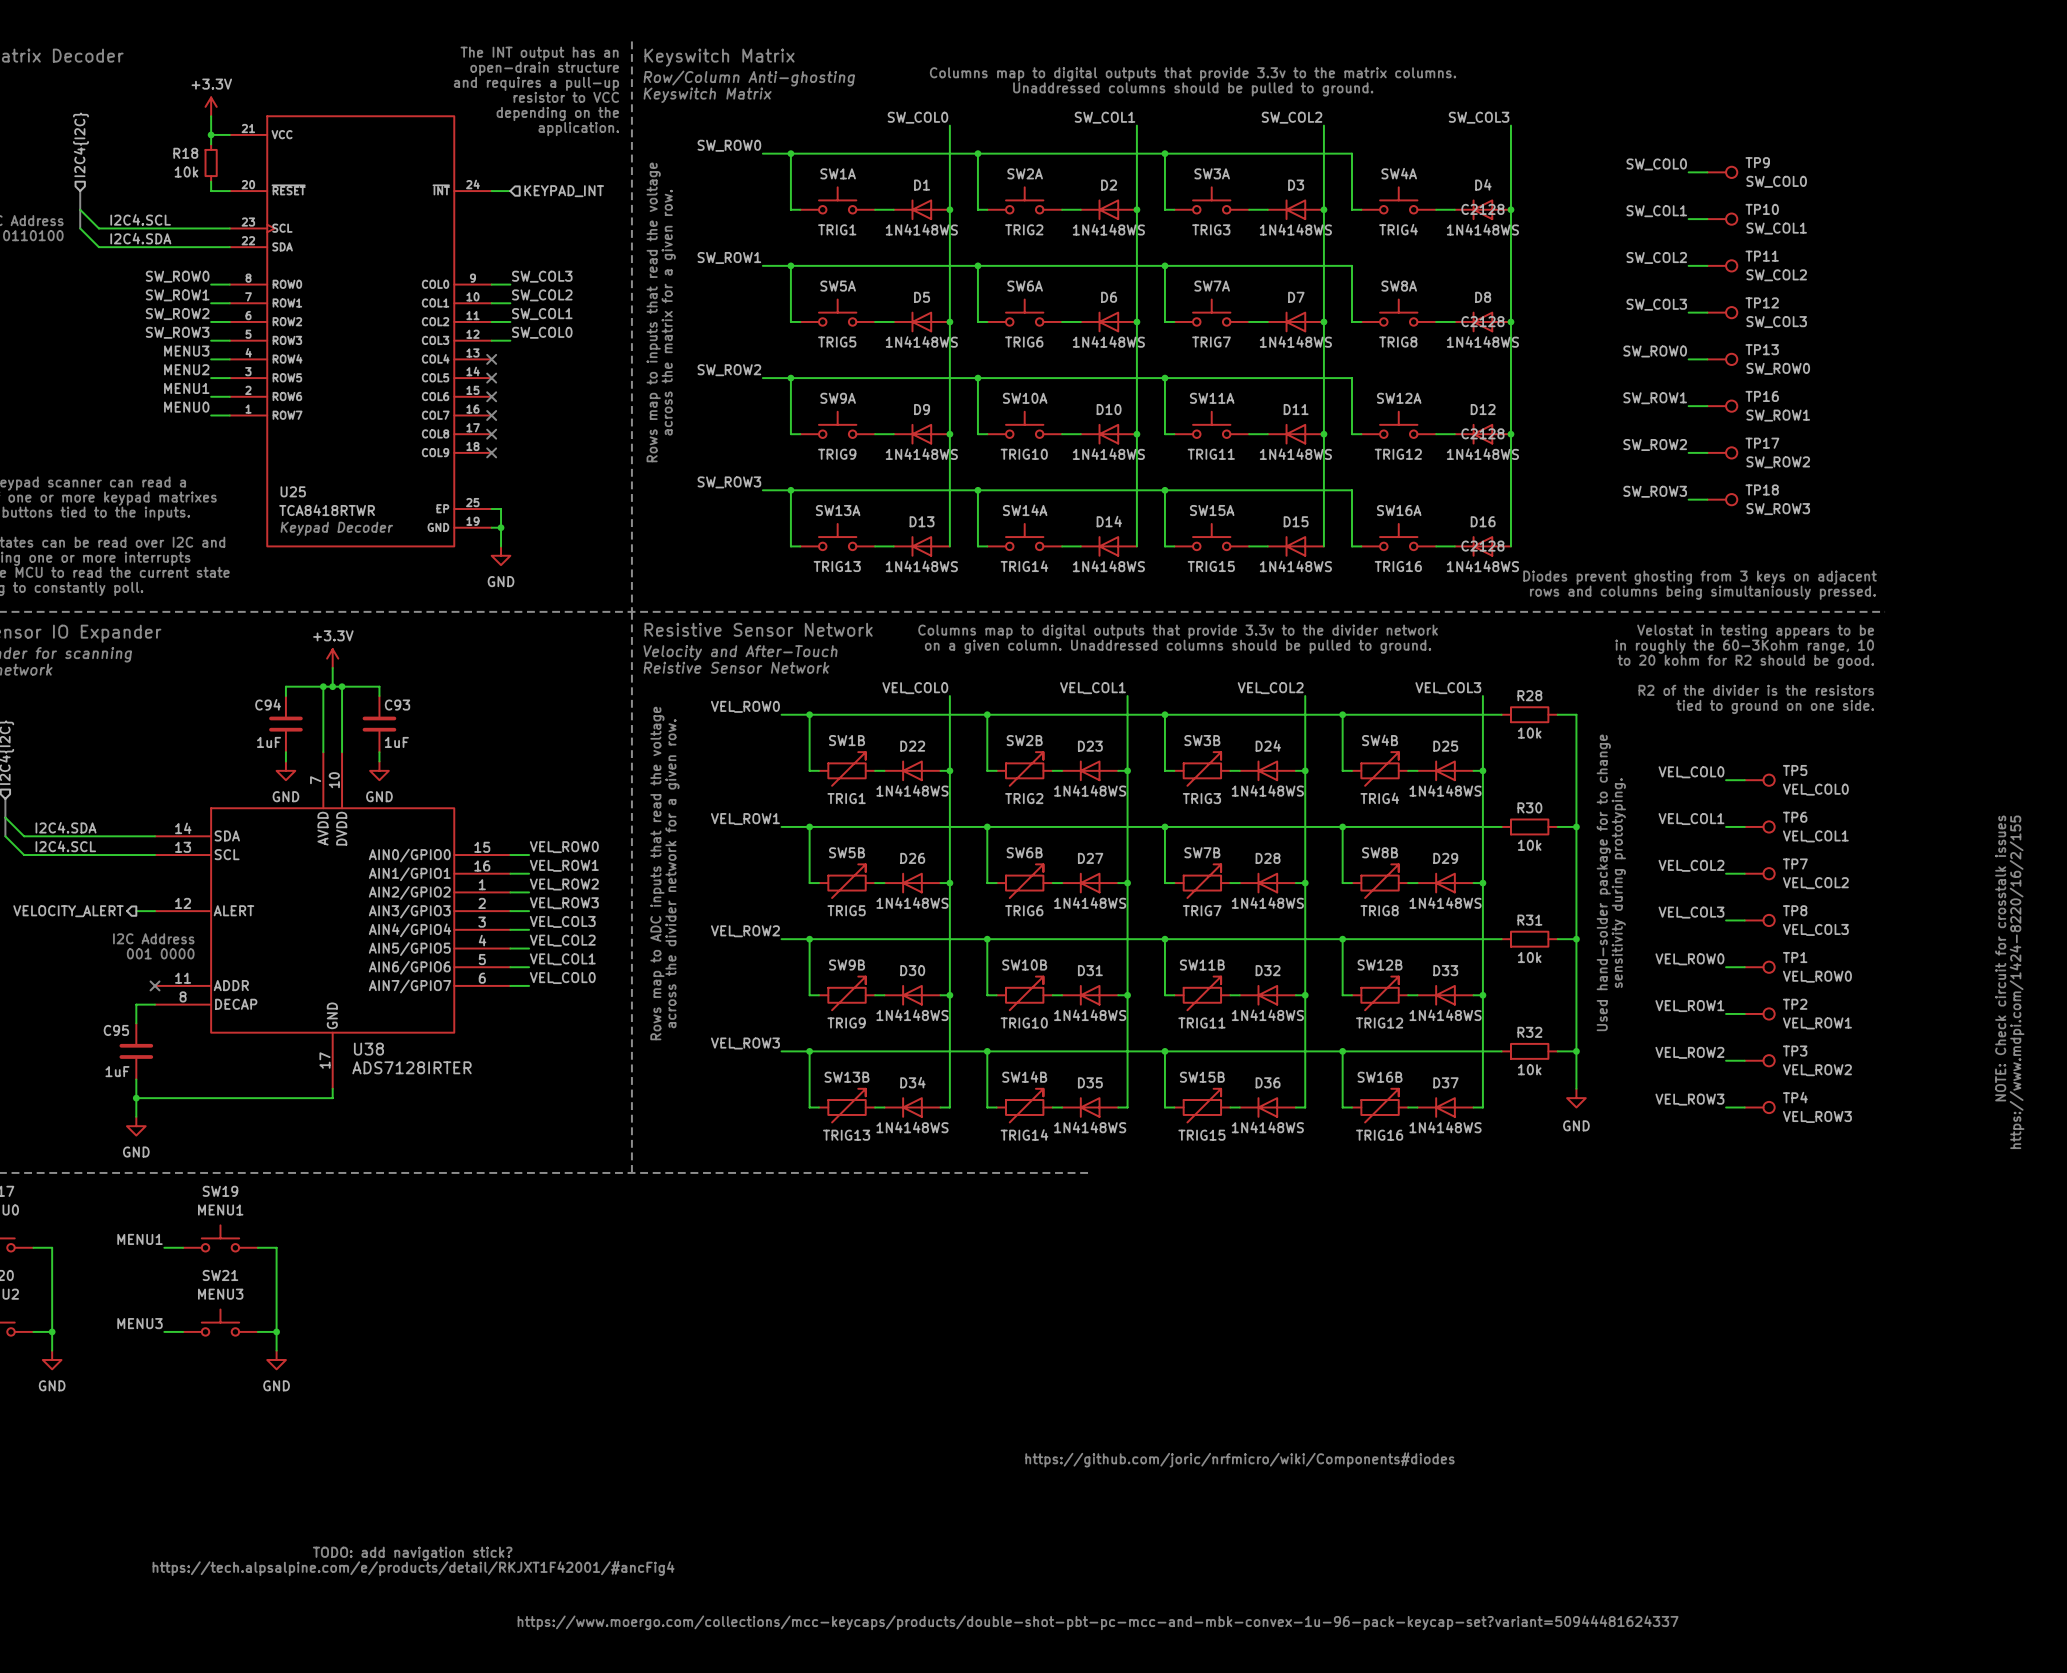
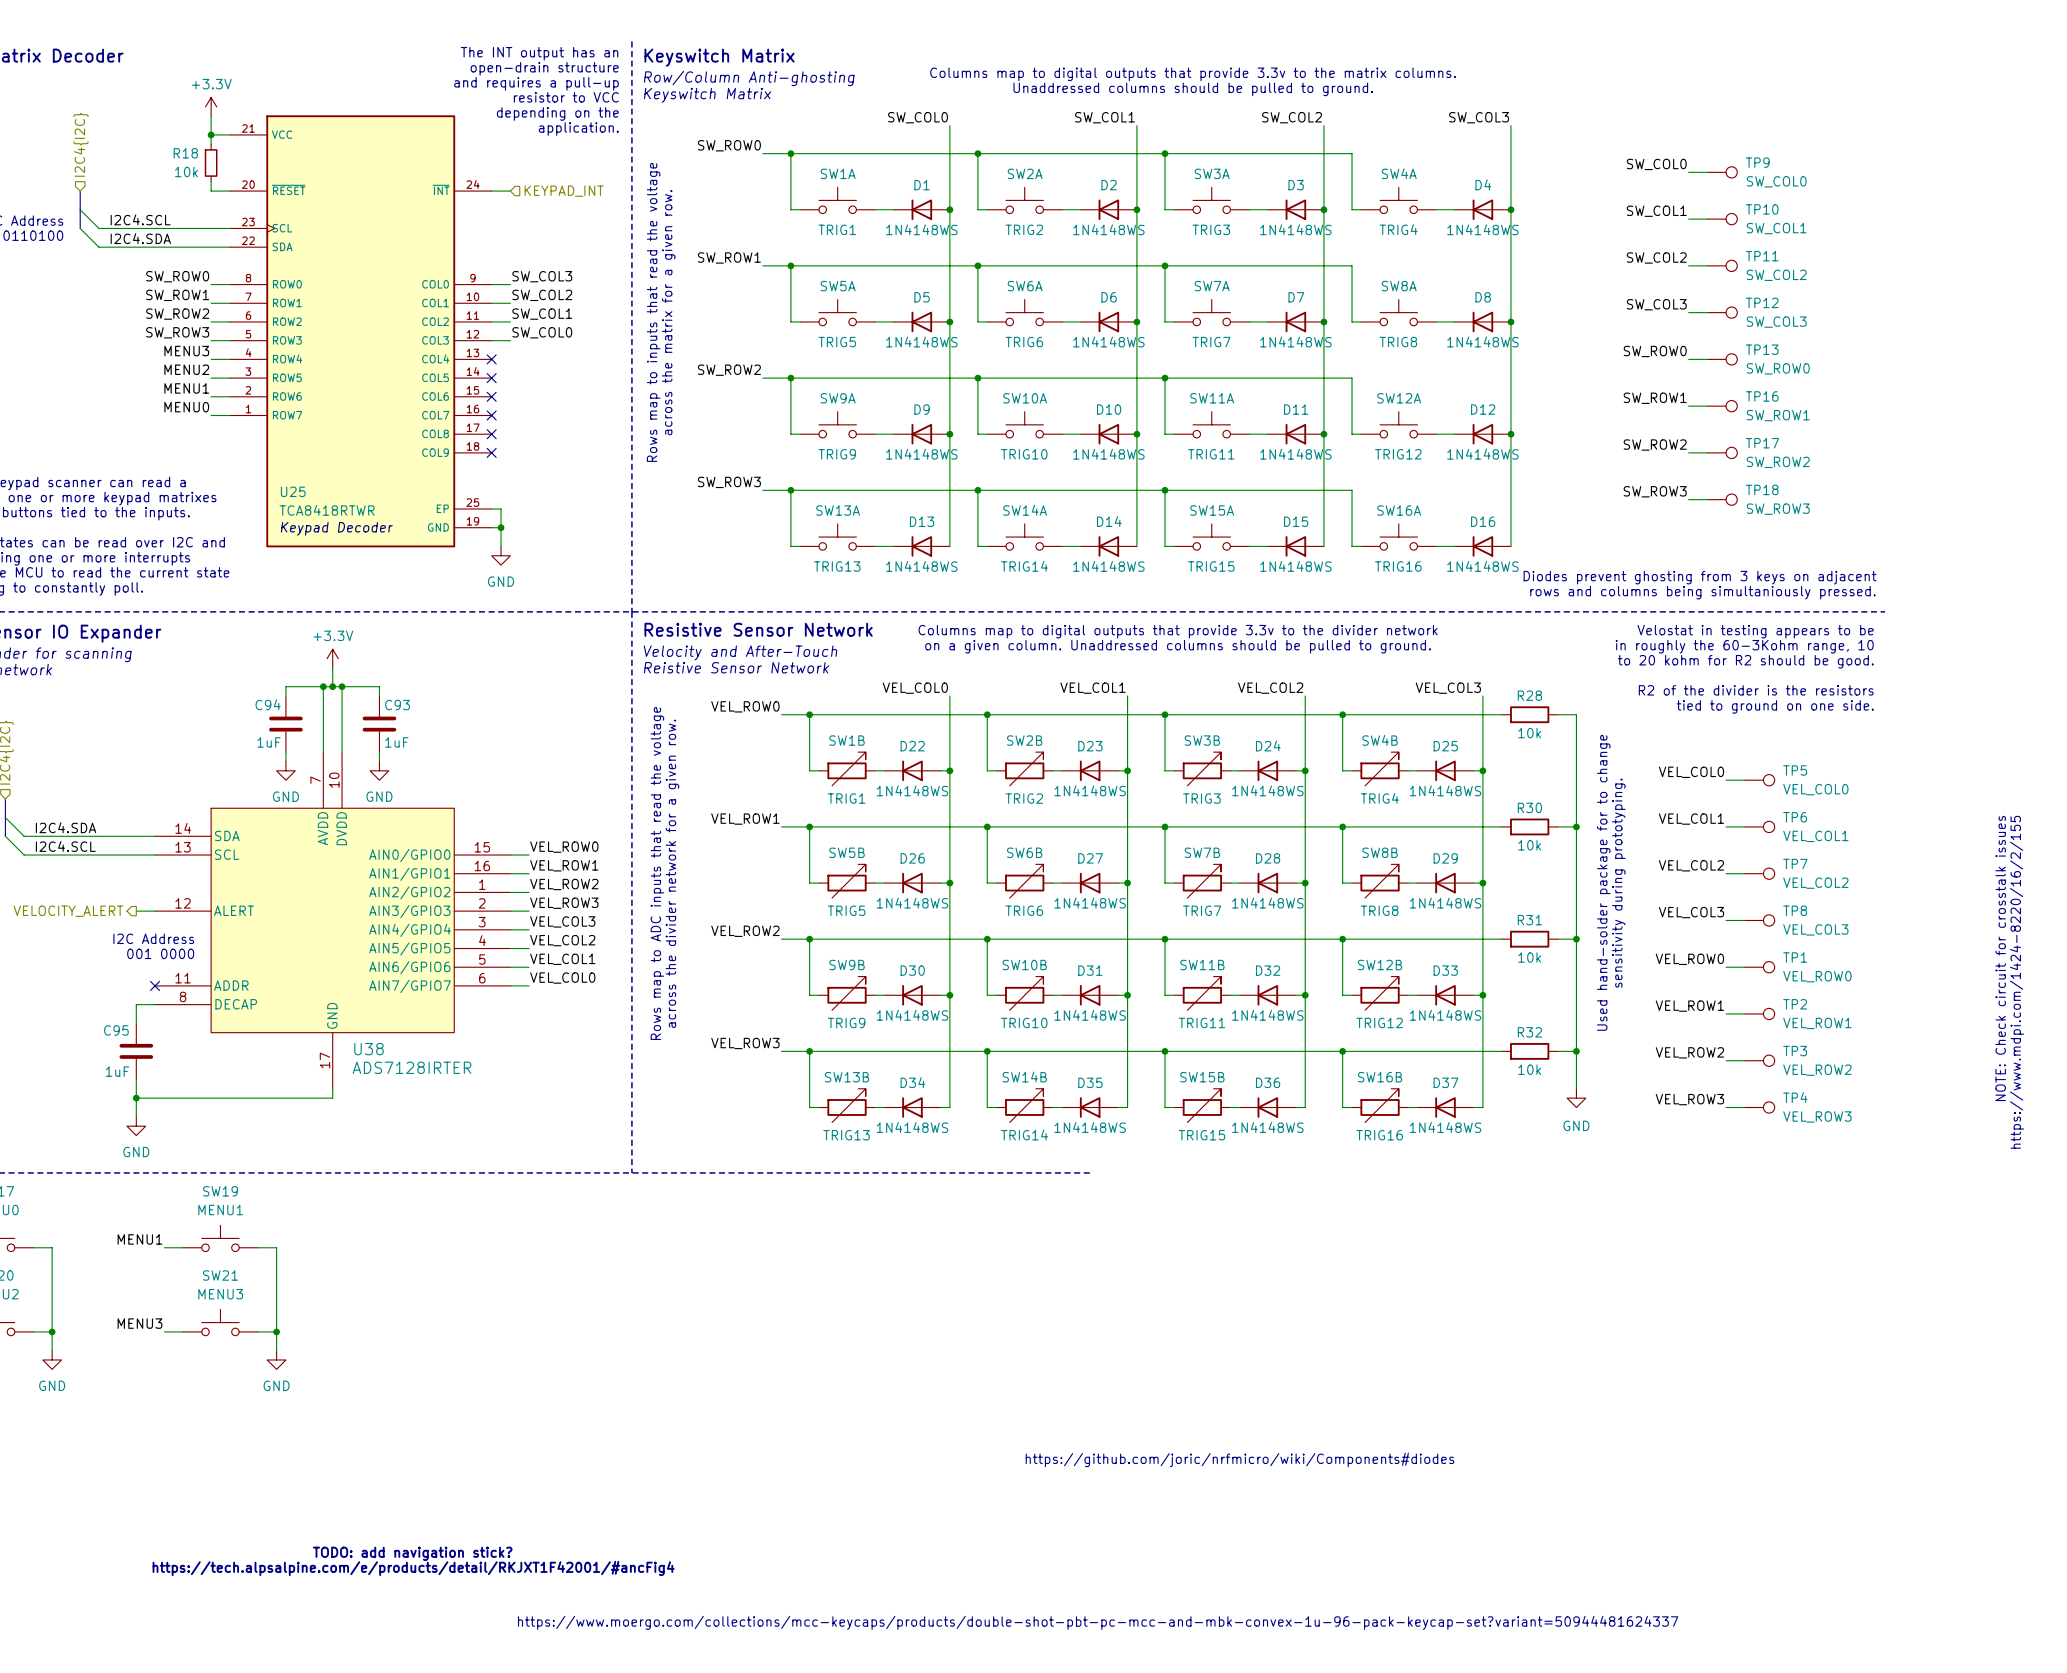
D4 text: C2128 (1482, 209) -> none
D8 text: C2128 (1482, 321) -> none
D12 text: C2128 (1482, 433) -> none
D16 text: C2128 (1482, 546) -> none

